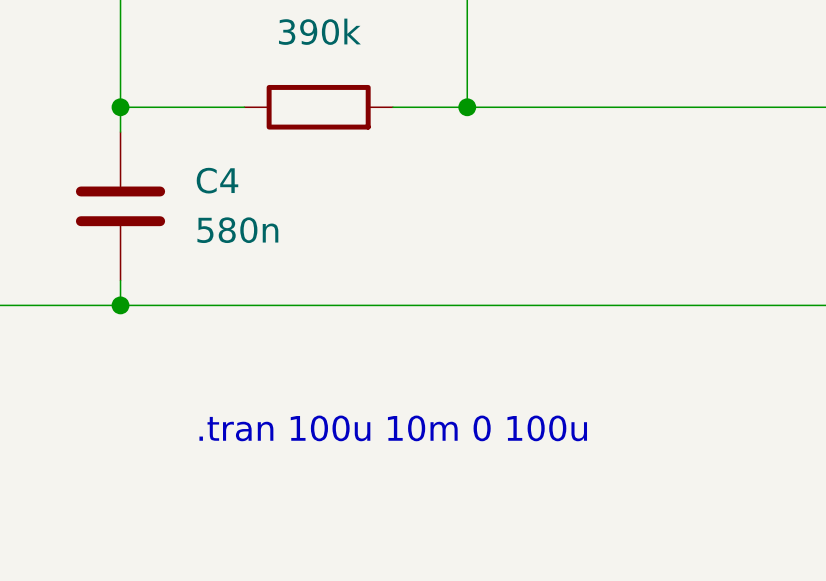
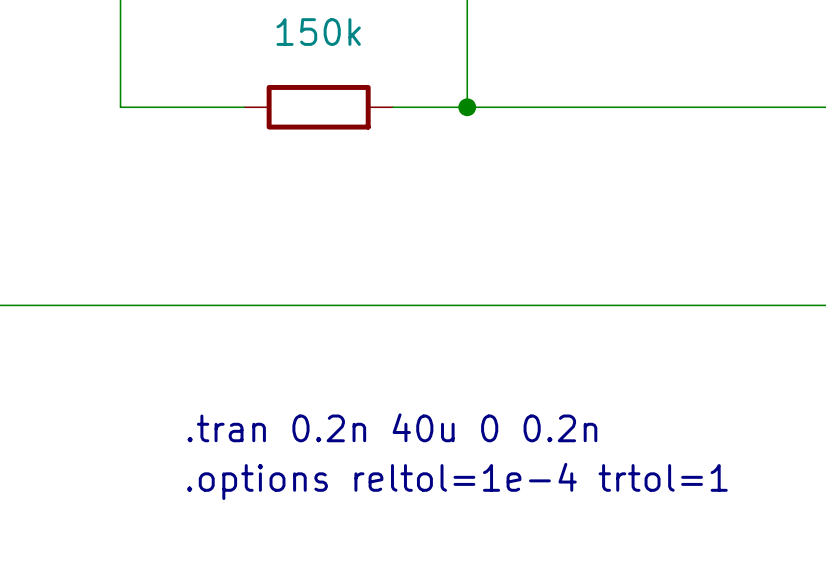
part value: 390k (319, 31) -> 150k (318, 32)
wire: (120, 107) (120, 132) -> none
junction: (120, 107) -> none
C4: 580n (120, 206) -> none
wire: (120, 280) (120, 305) -> none
junction: (120, 305) -> none
text: .tran 100u 10m 0 100u (393, 428) -> .tran 0.2n 40u 0 0.2n (392, 427)
text: none -> .options reltol=1e-4 trtol=1 (457, 481)

